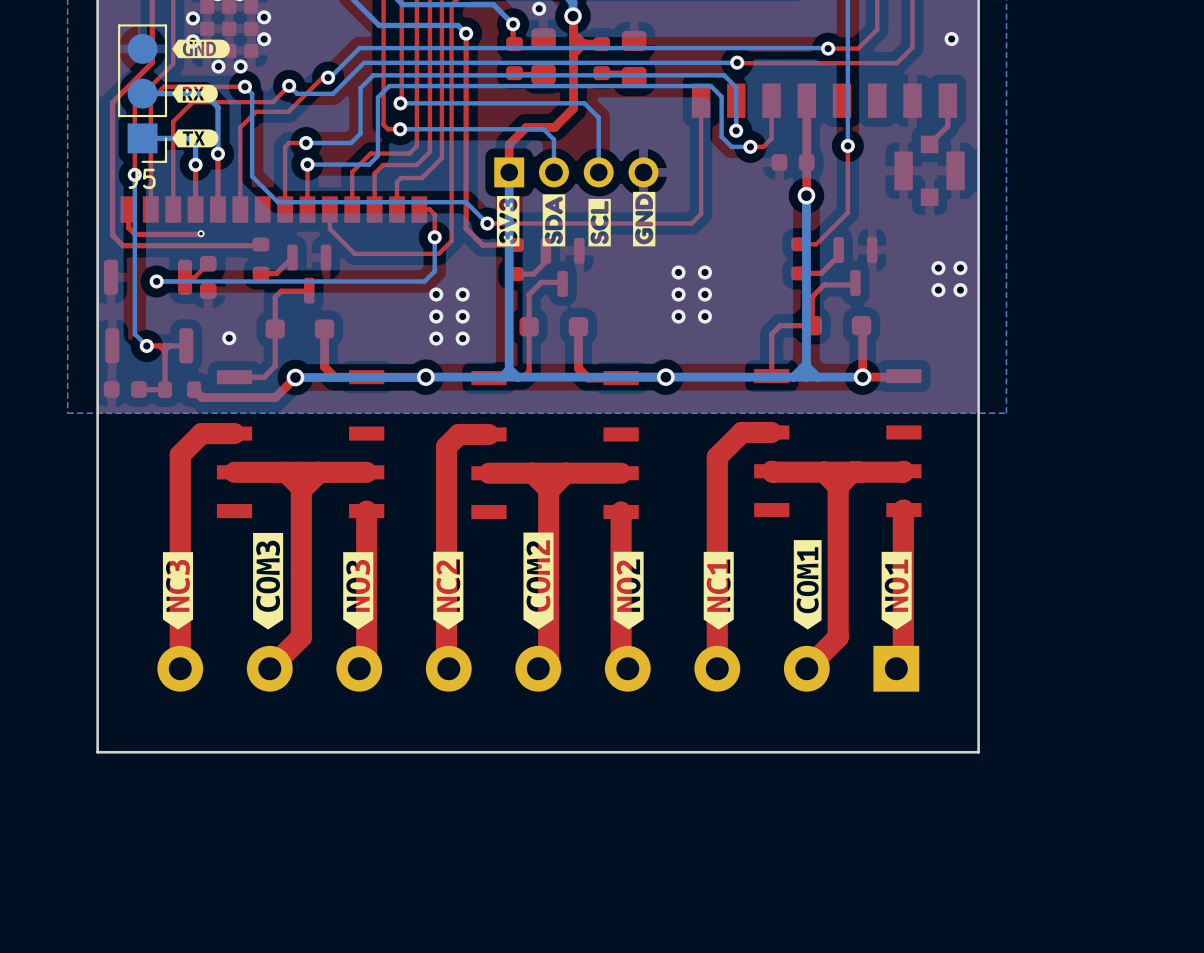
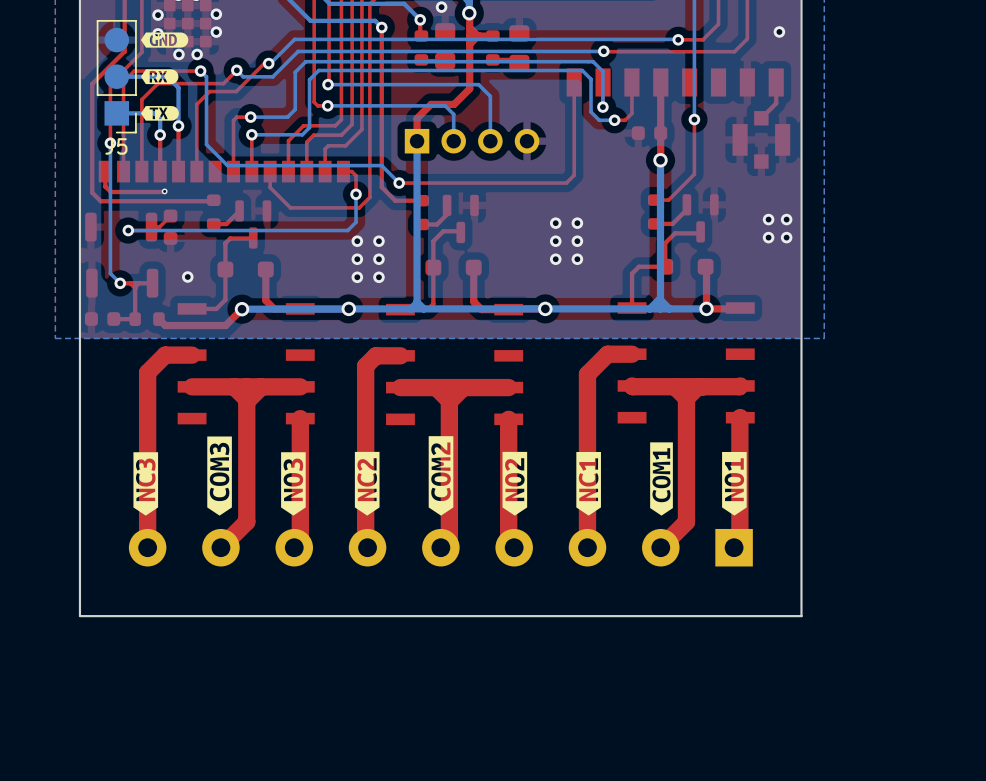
drawing: [632, 191, 656, 247] -> none
drawing: [542, 194, 566, 247] -> none
drawing: [496, 196, 520, 247] -> none
drawing: [588, 198, 611, 247] -> none

